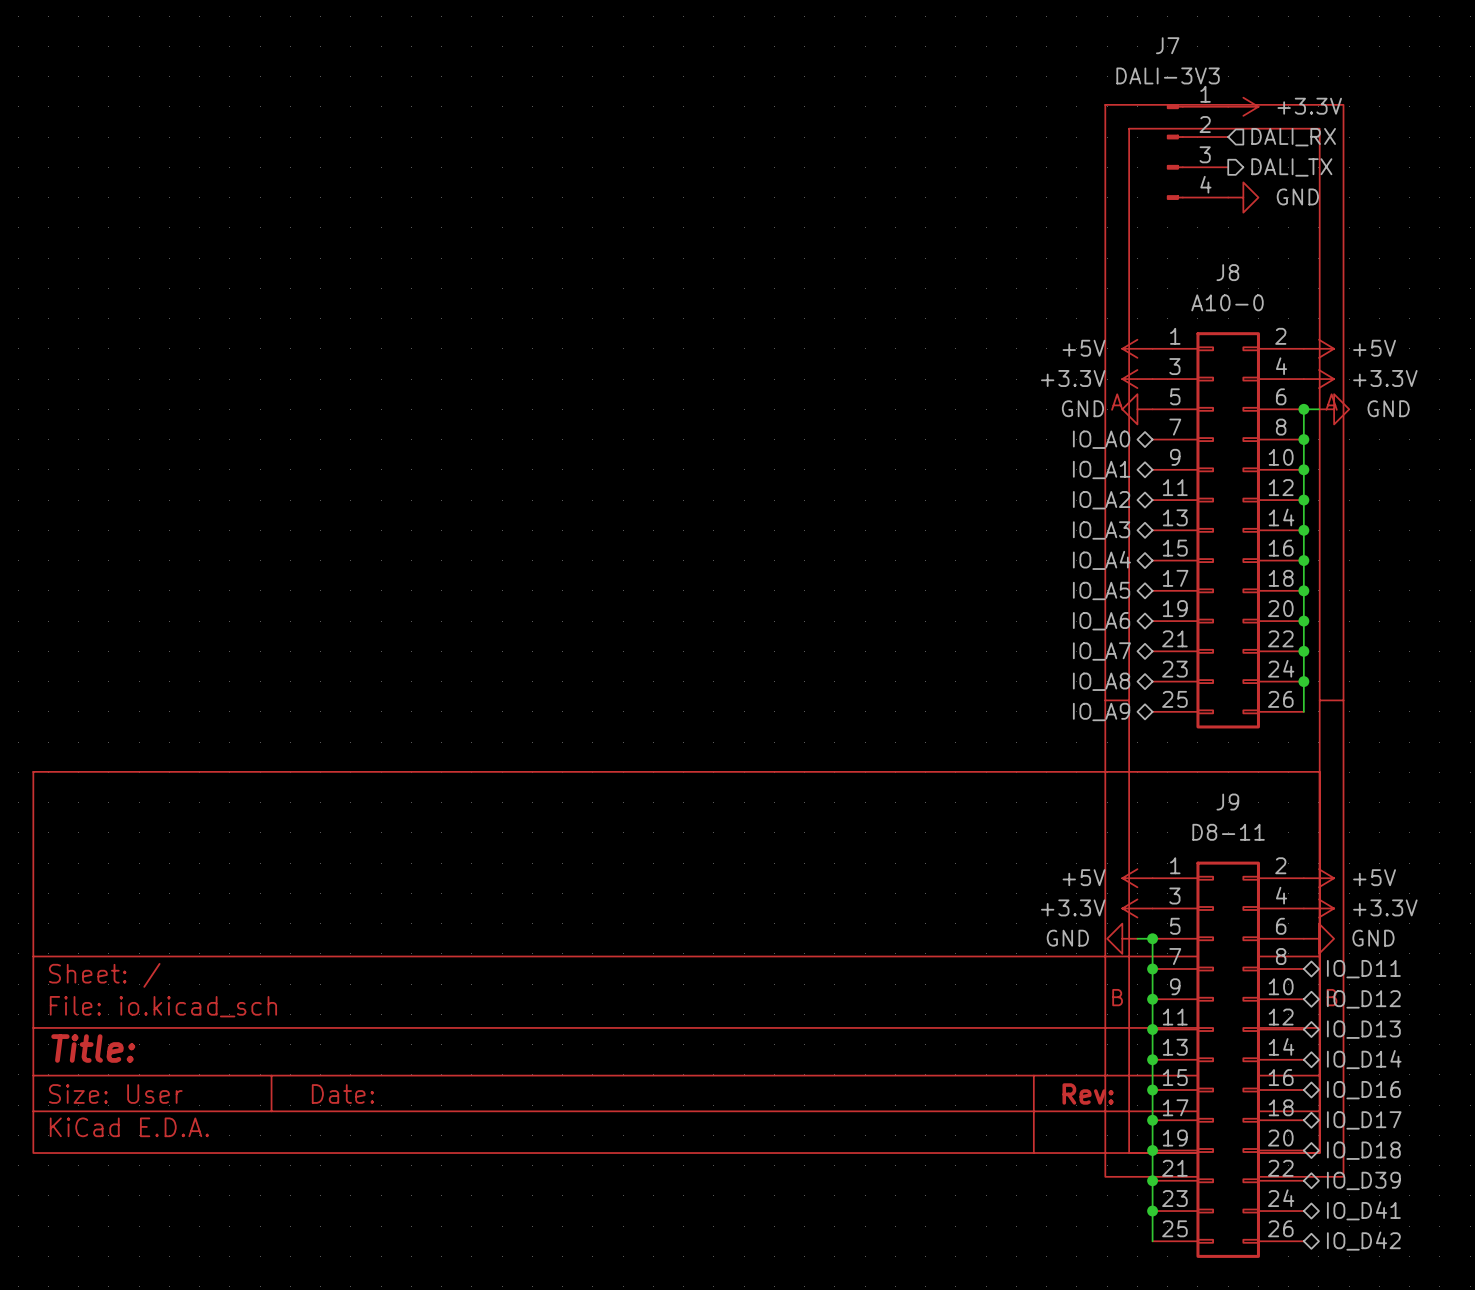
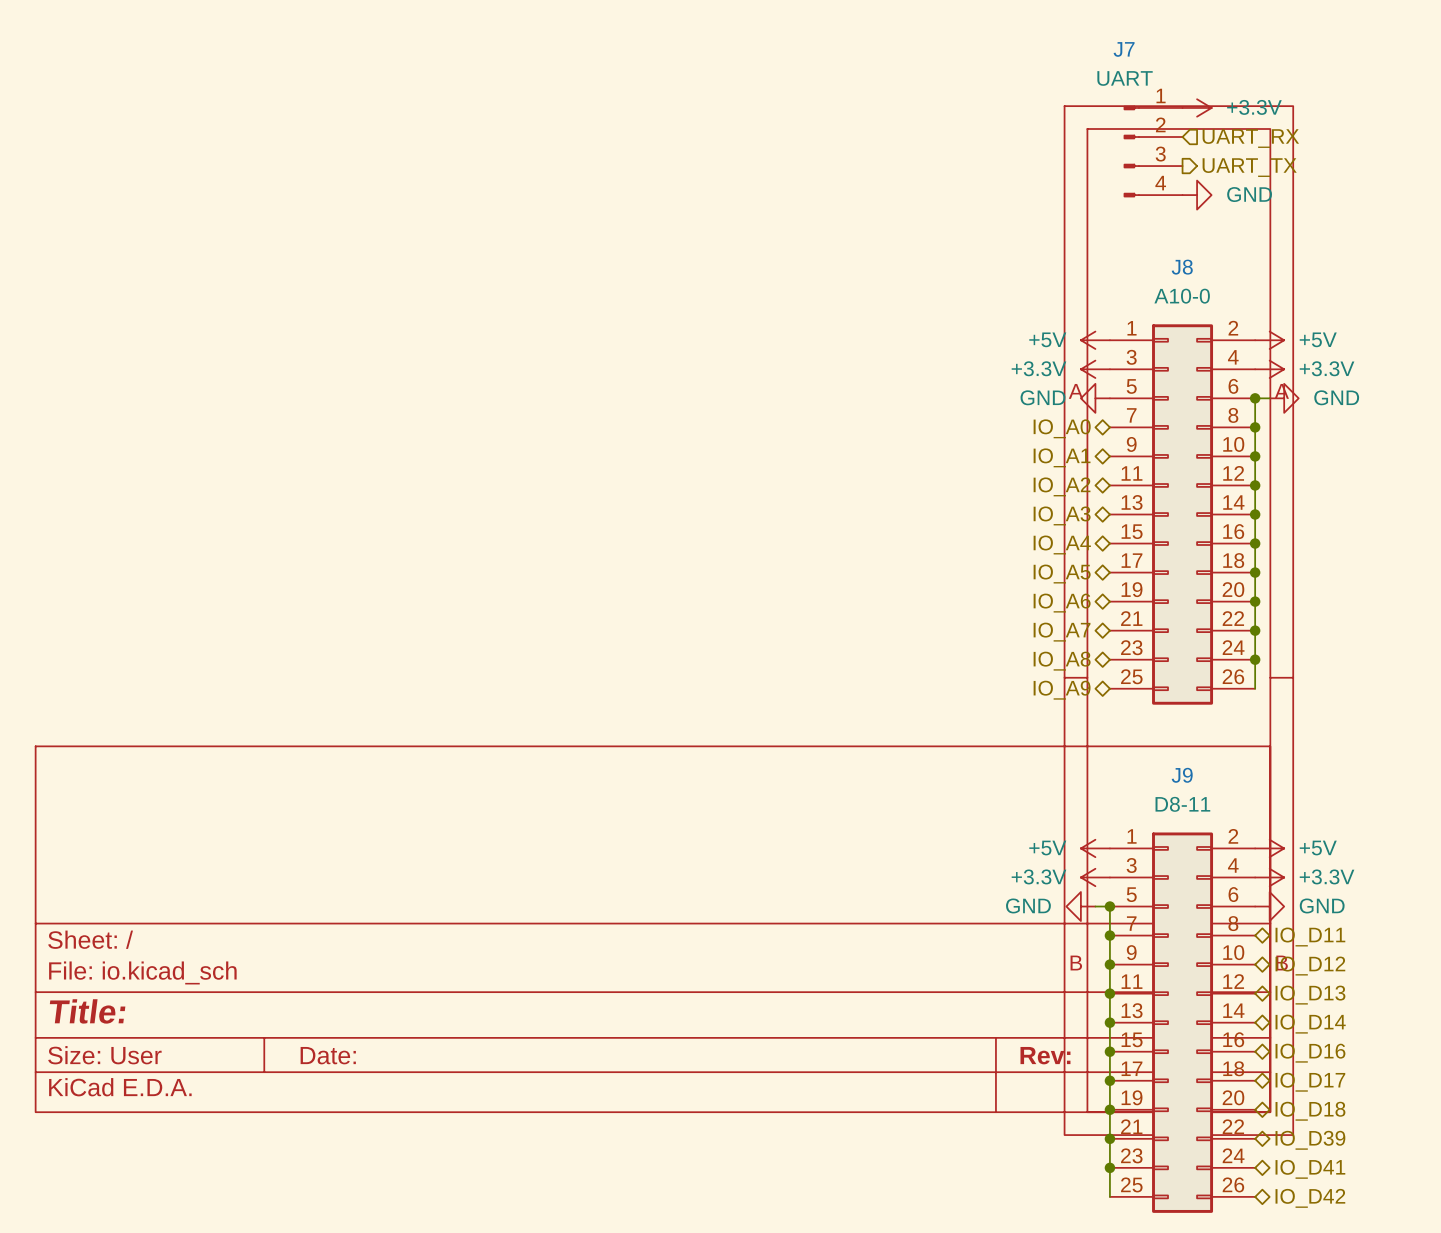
J7 value: DALI-3V3 (1168, 75) -> UART (1125, 78)
hierarchical label: DALI_RX (1293, 137) -> UART_RX (1250, 138)
hierarchical label: DALI_TX (1291, 167) -> UART_TX (1249, 167)

